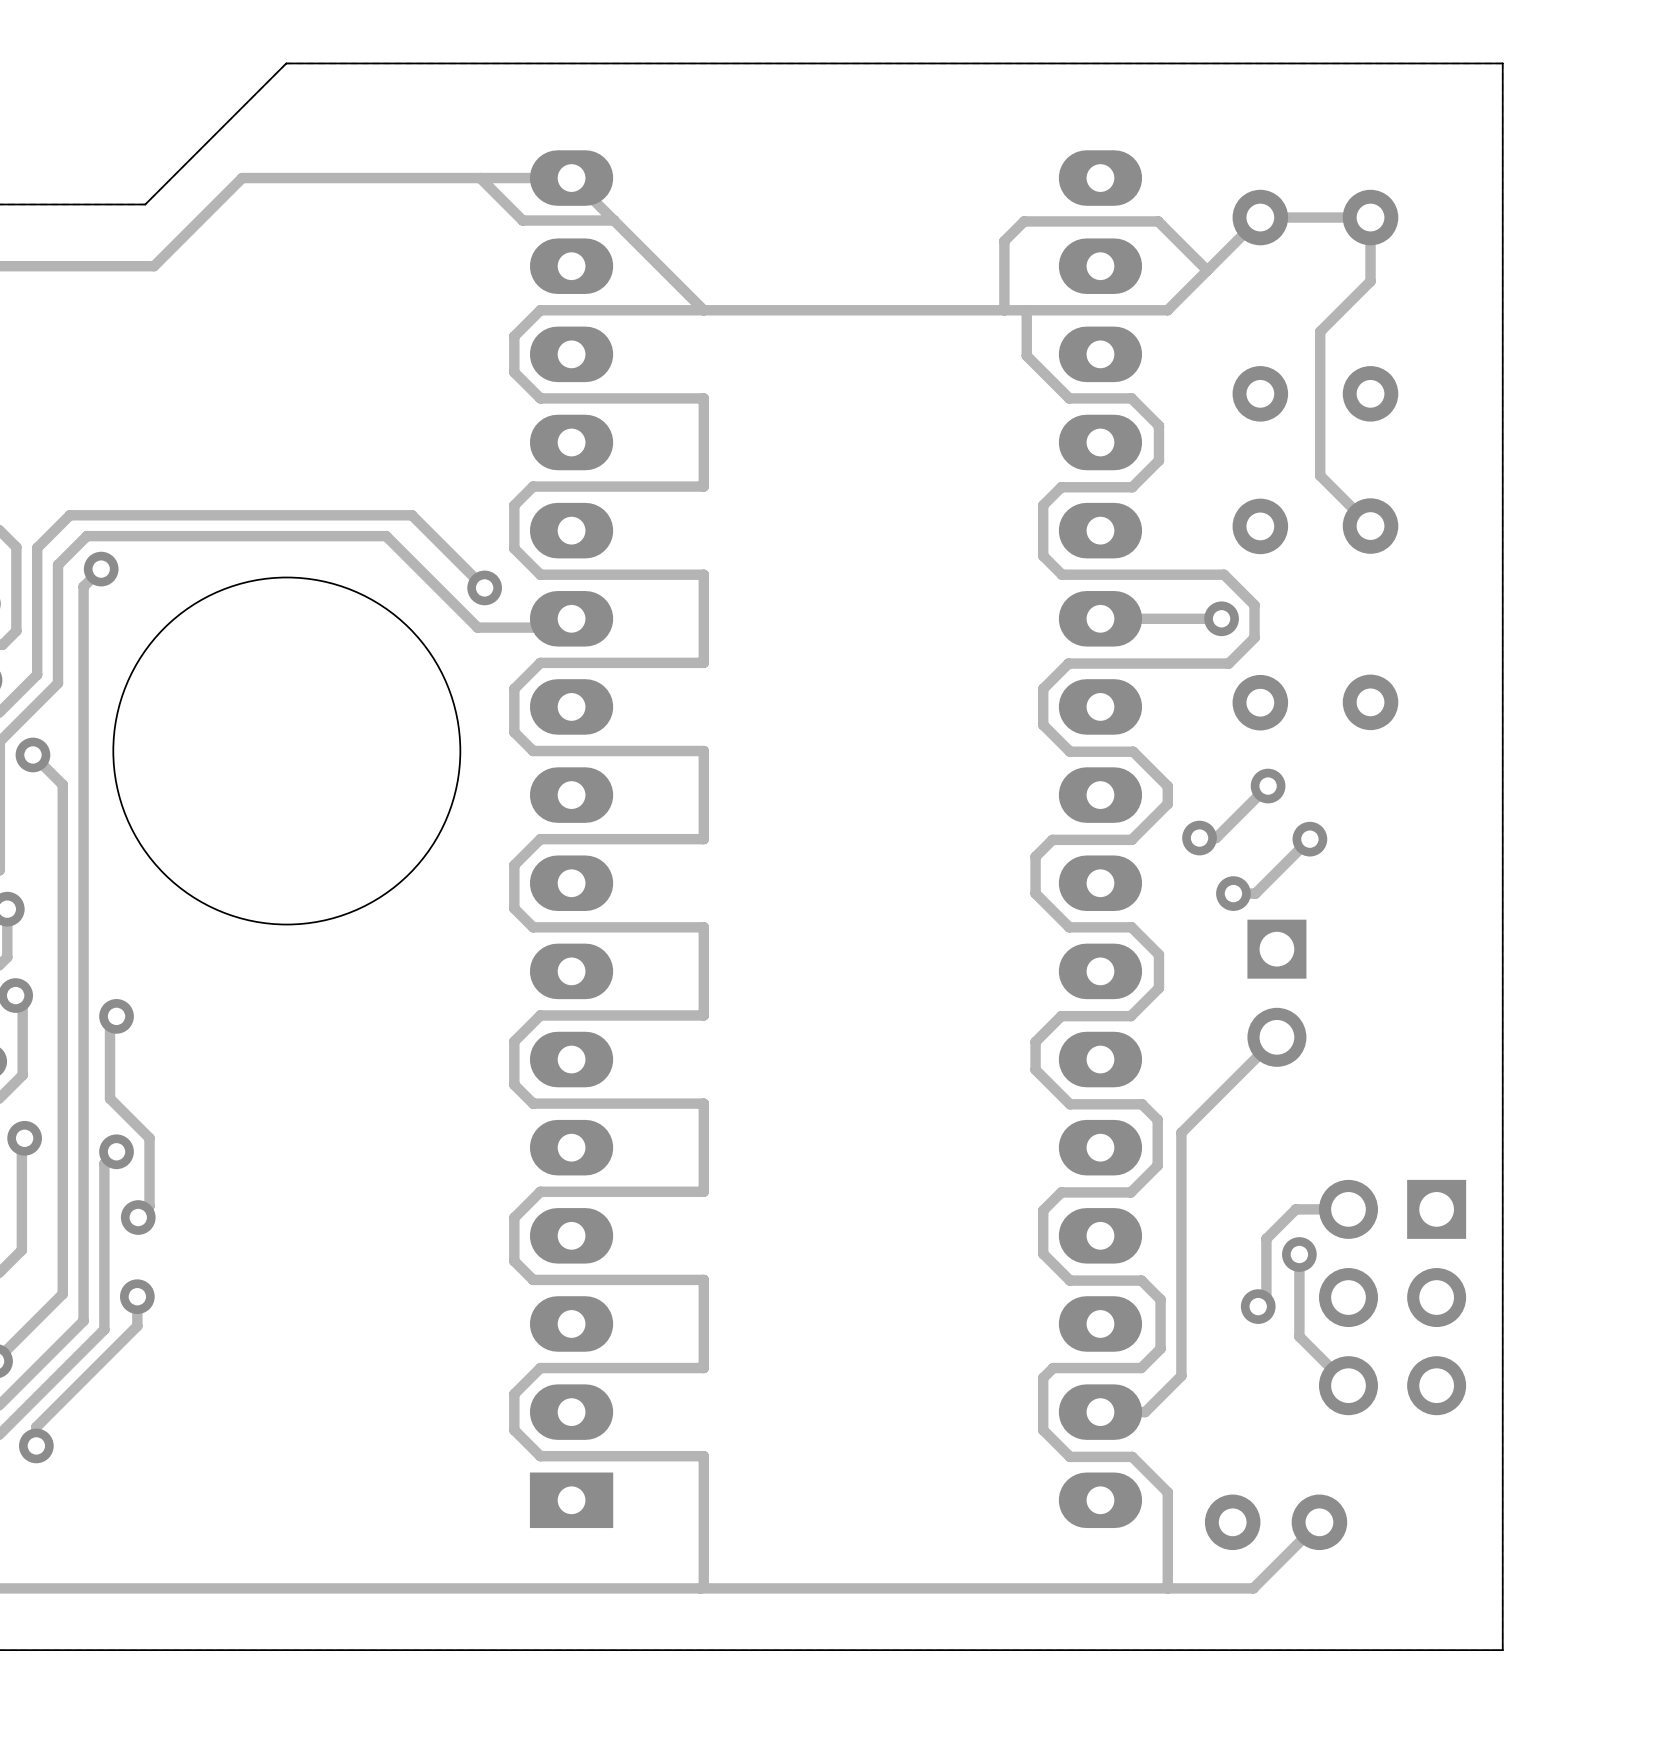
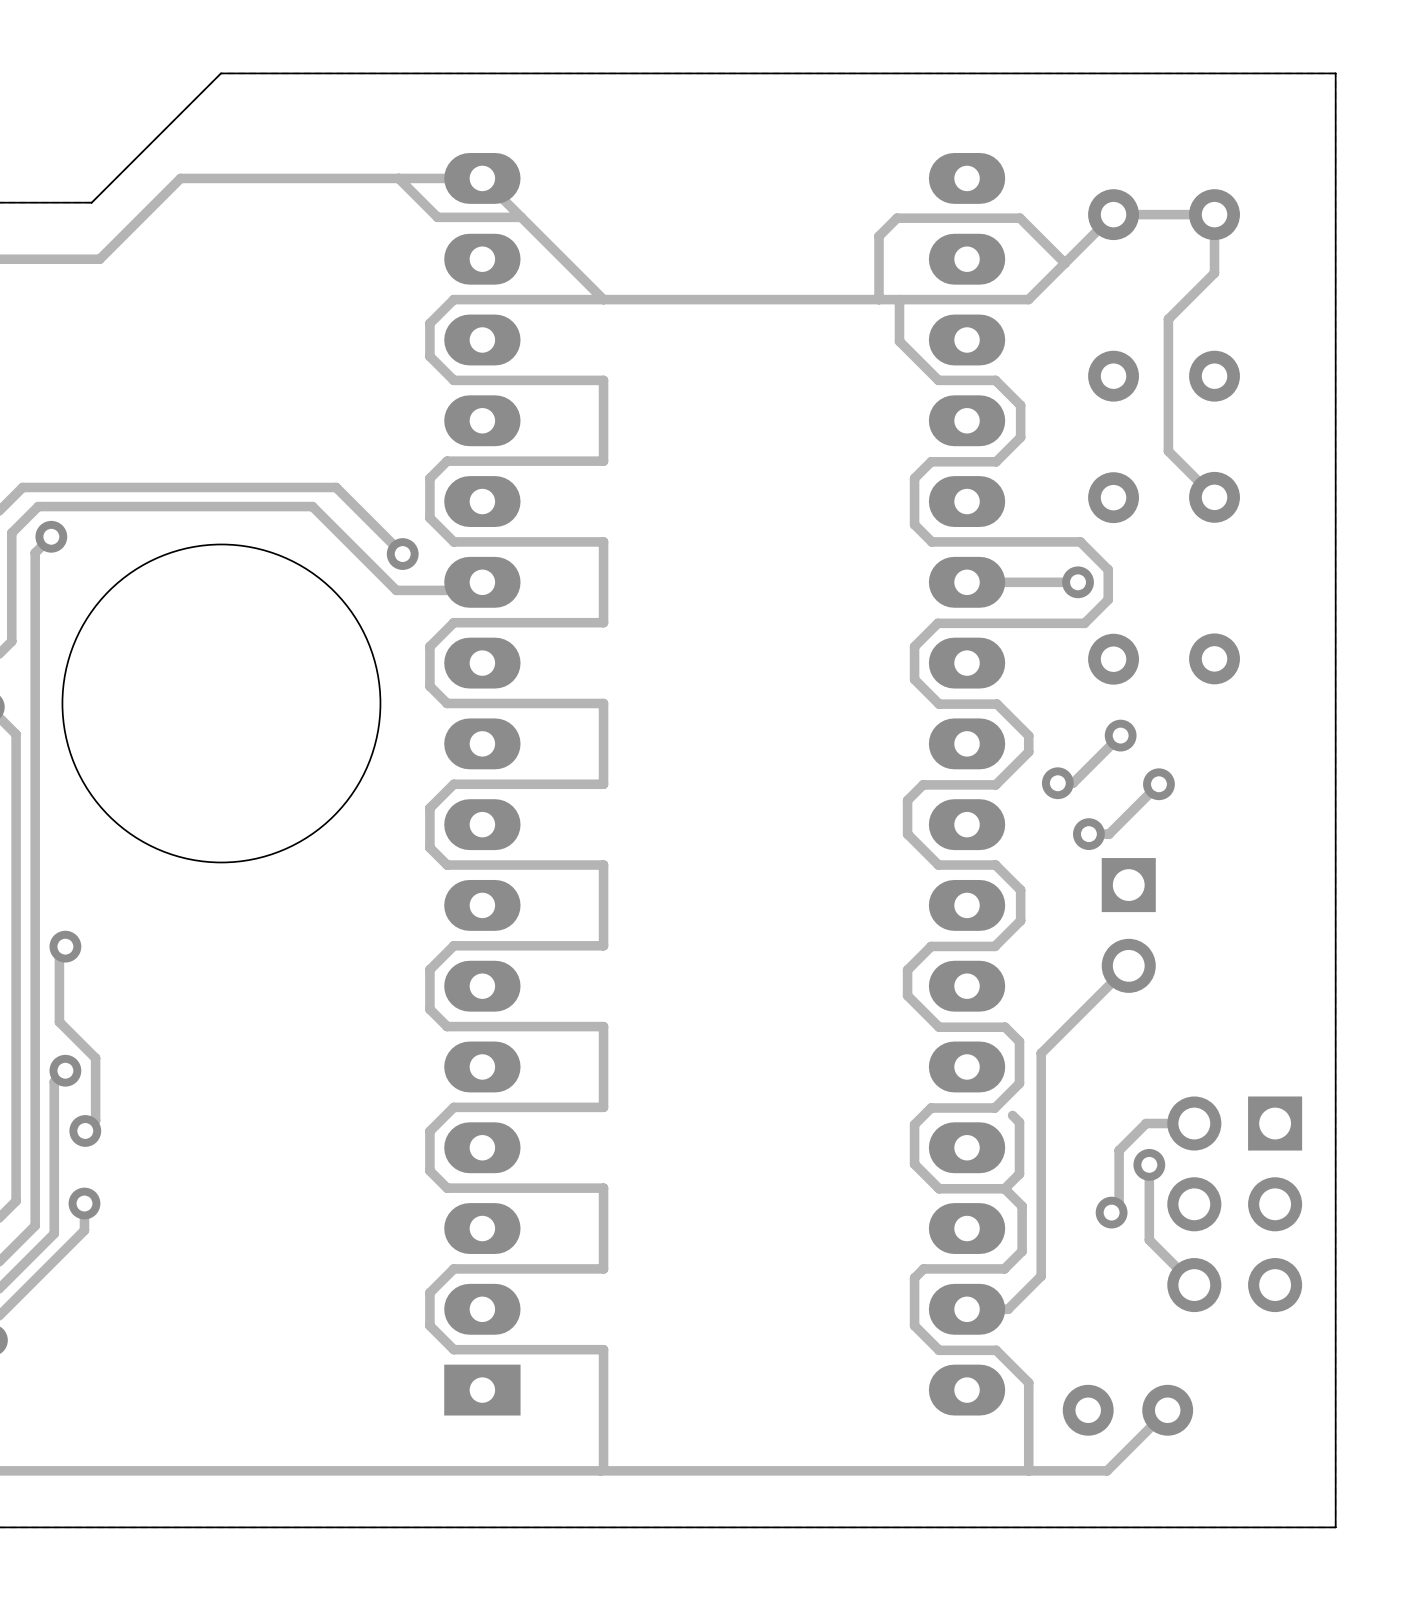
track: none -> (1012, 1115) (1019, 1122) (1019, 1173) (1004, 1188)

